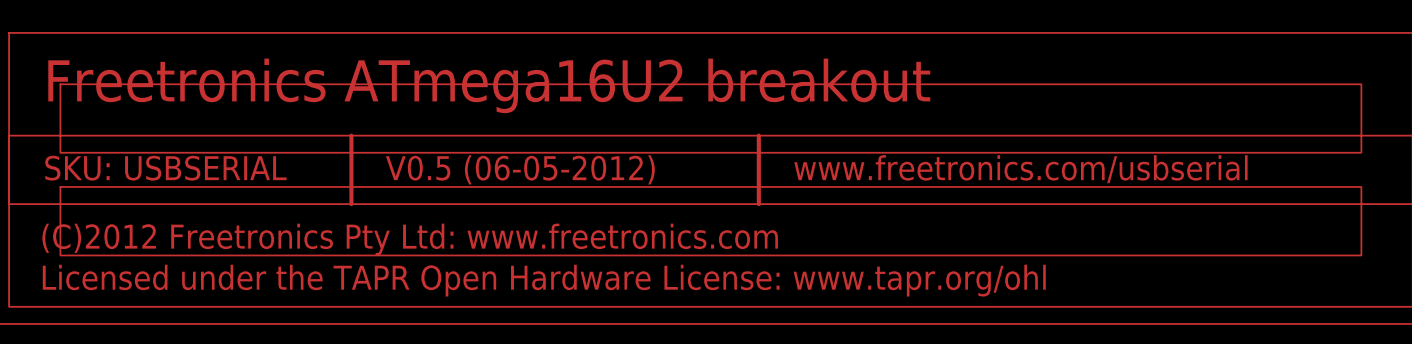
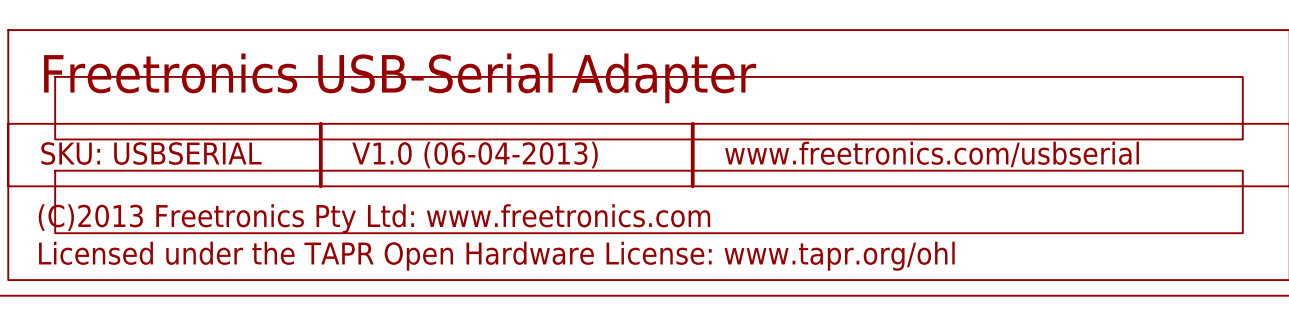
text: Freetronics ATmega16U2 breakout (489, 85) -> Freetronics USB-Serial Adapter (400, 78)
text: V0.5 (06-05-2012) (520, 169) -> V1.0 (06-04-2013) (475, 155)
text: (C)2012 Freetronics Pty Ltd: www.freetronics.com (410, 239) -> (C)2013 Freetronics Pty Ltd: www.freetronics.com (374, 218)

